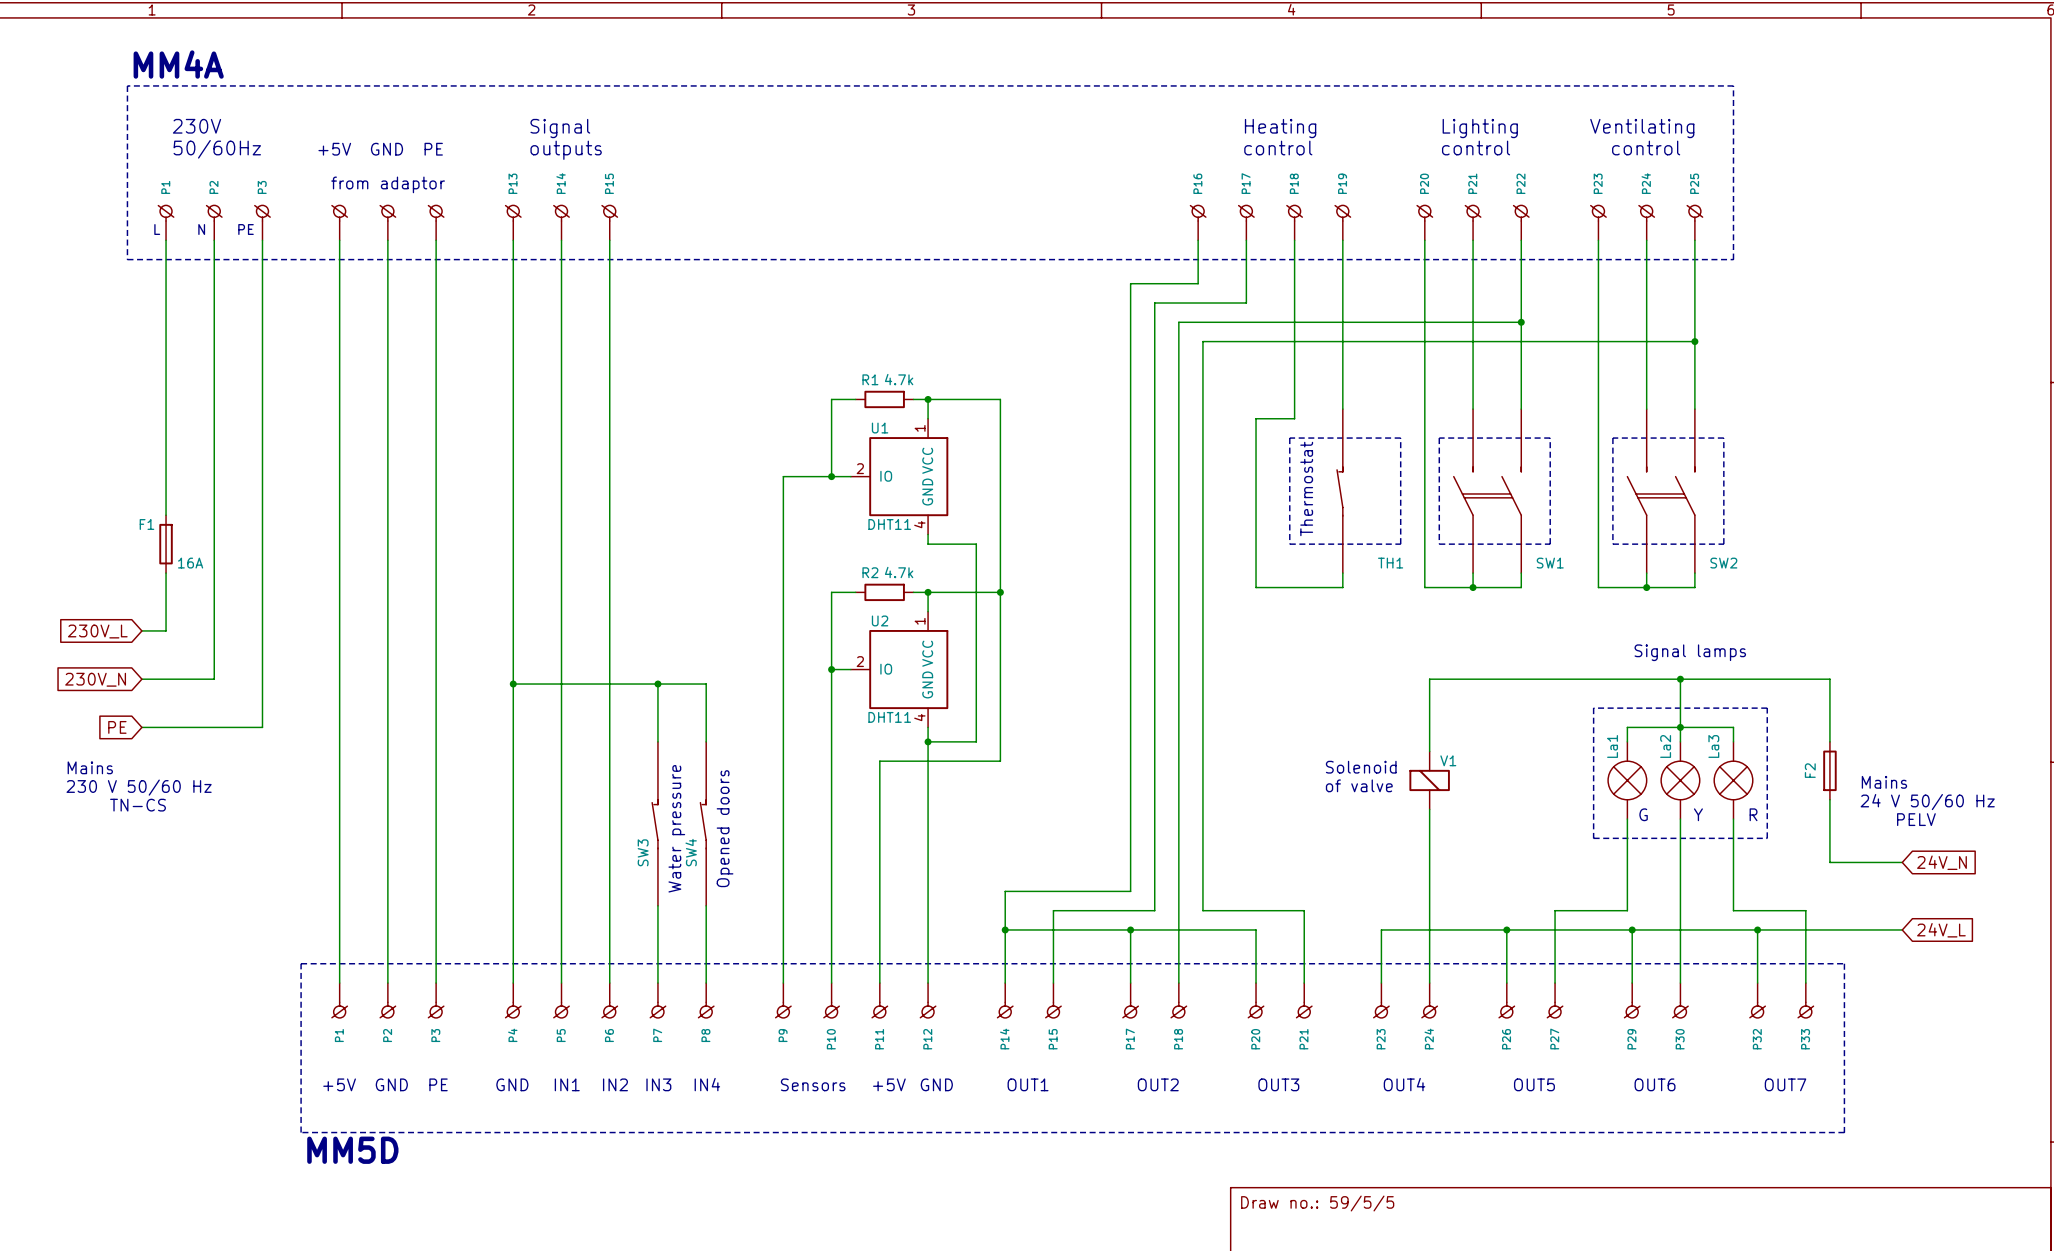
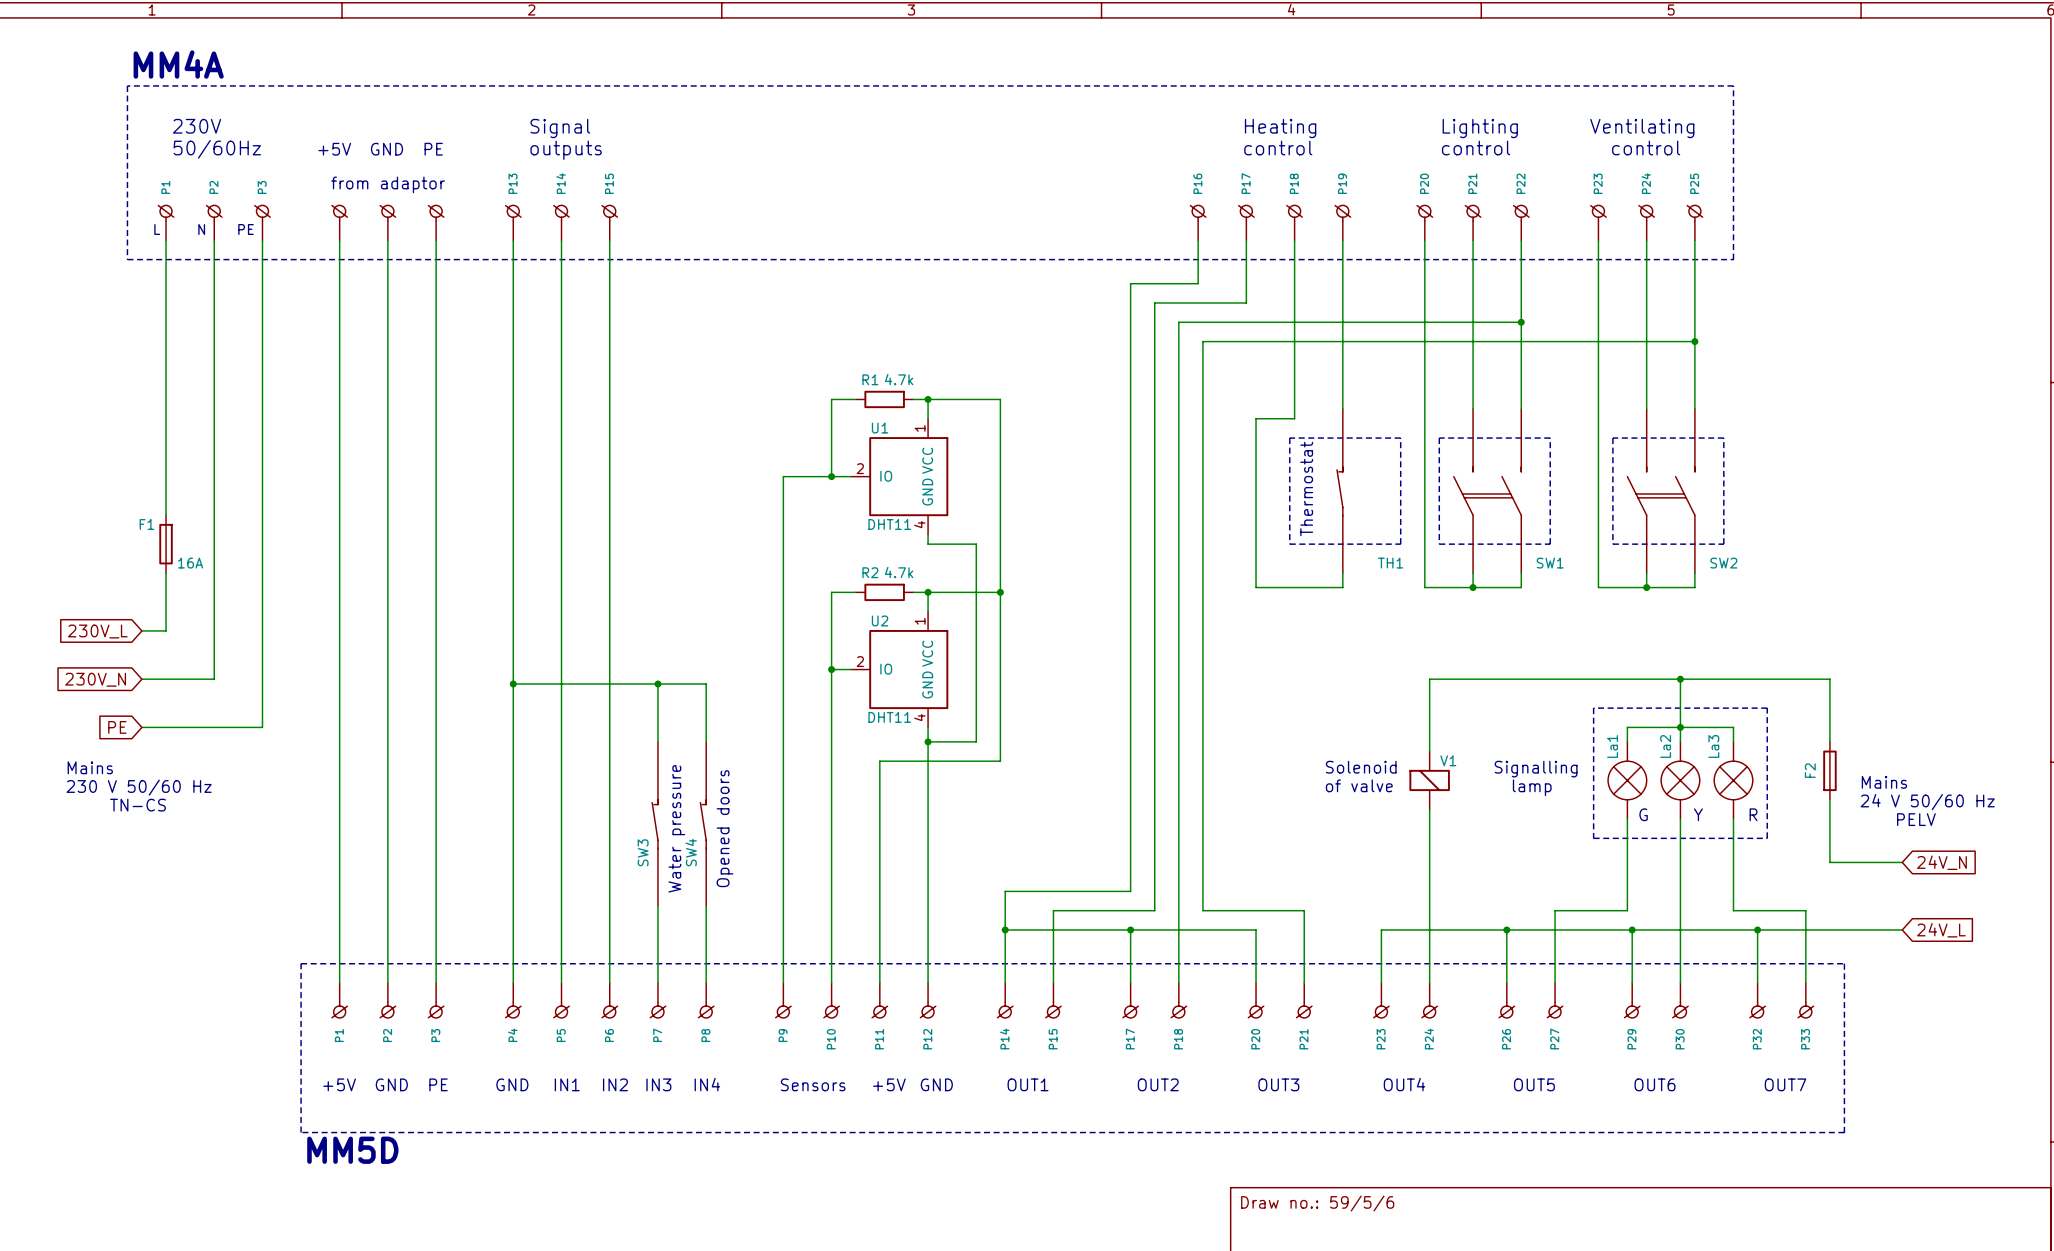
text: Signal lamps (1690, 652) -> none
text: none -> Signalling (1536, 769)
text: none -> lamp (1532, 787)
title block: Draw no.: 59/5/5 (1317, 1203) -> Draw no.: 59/5/6 (1317, 1203)

